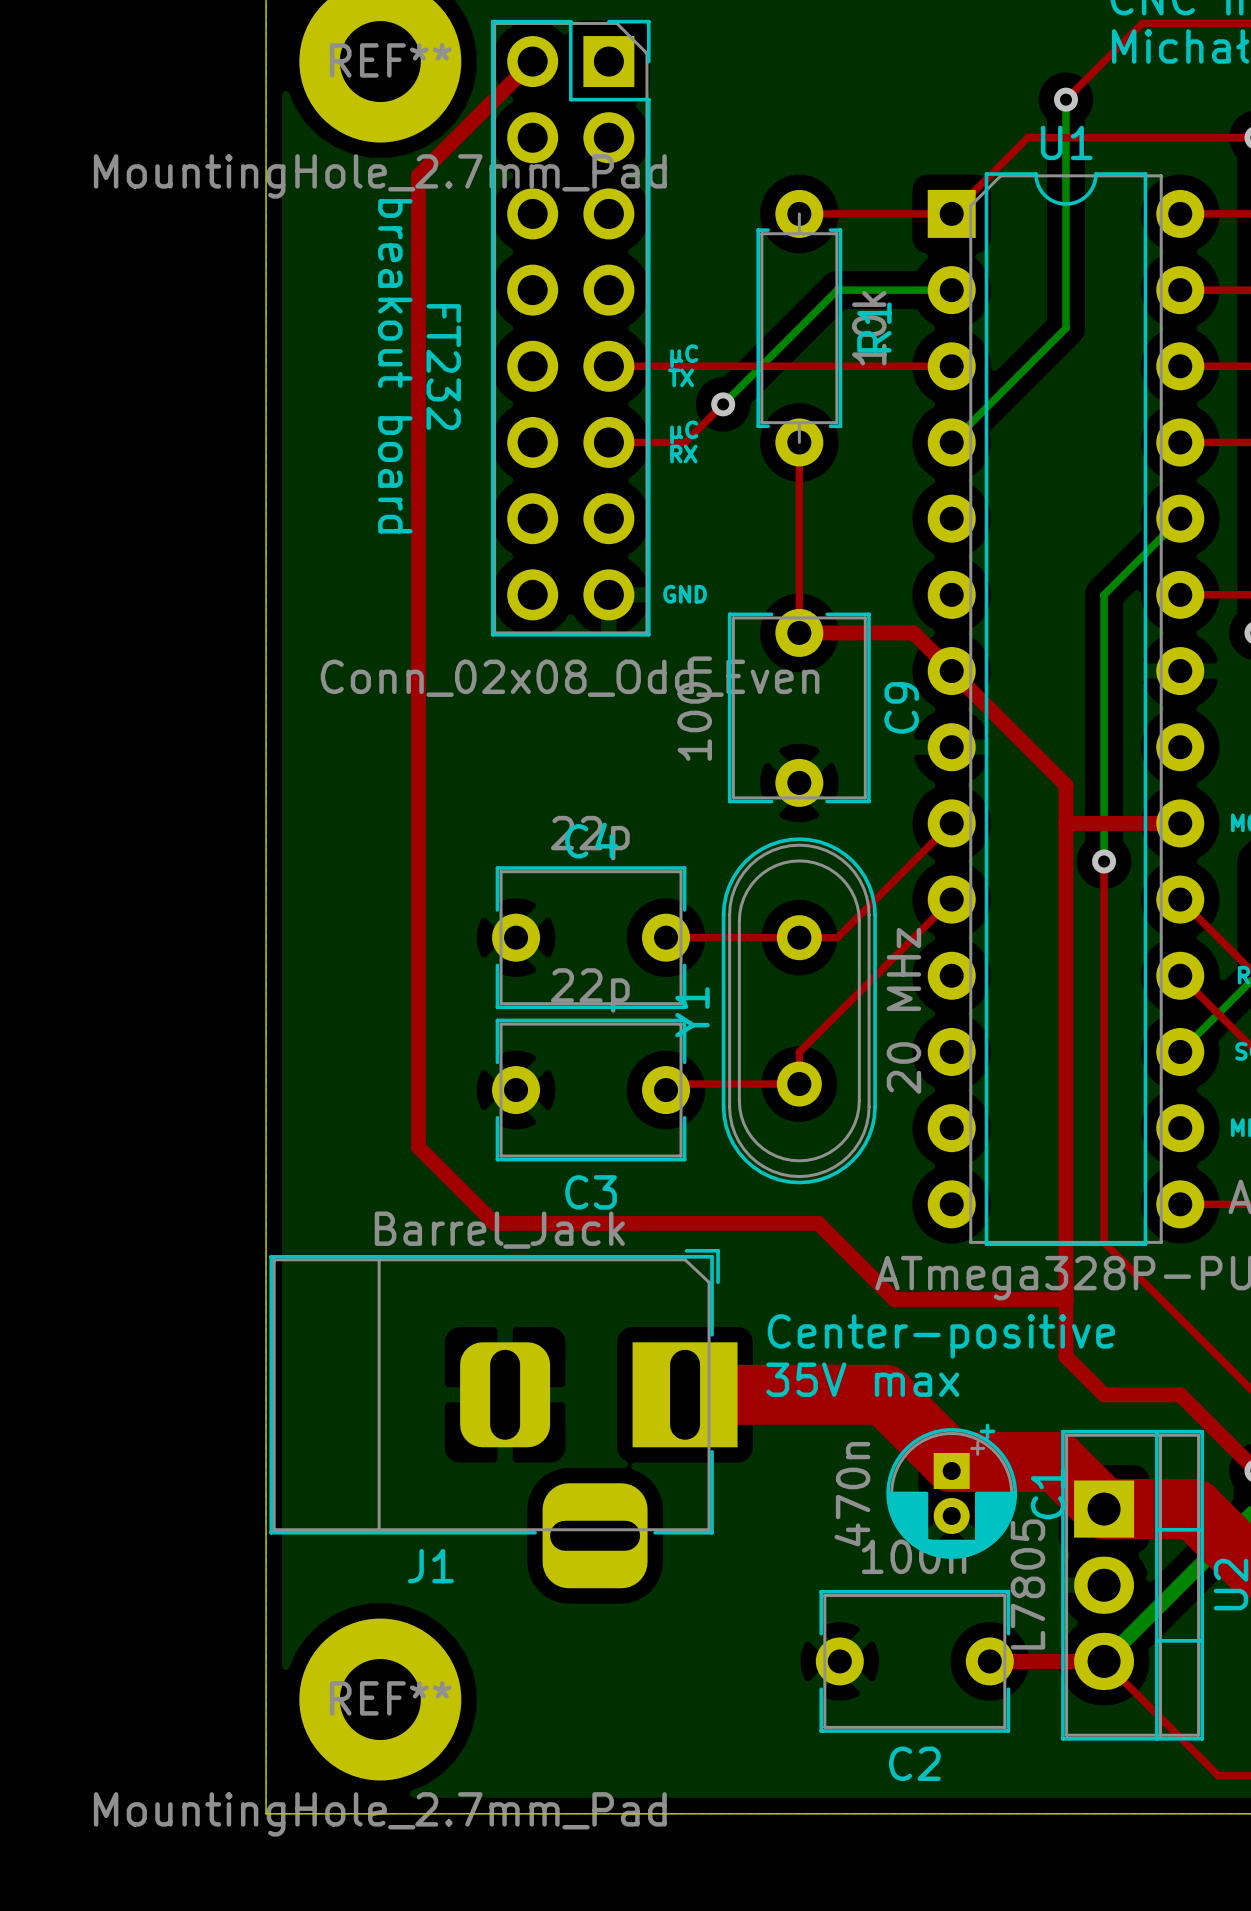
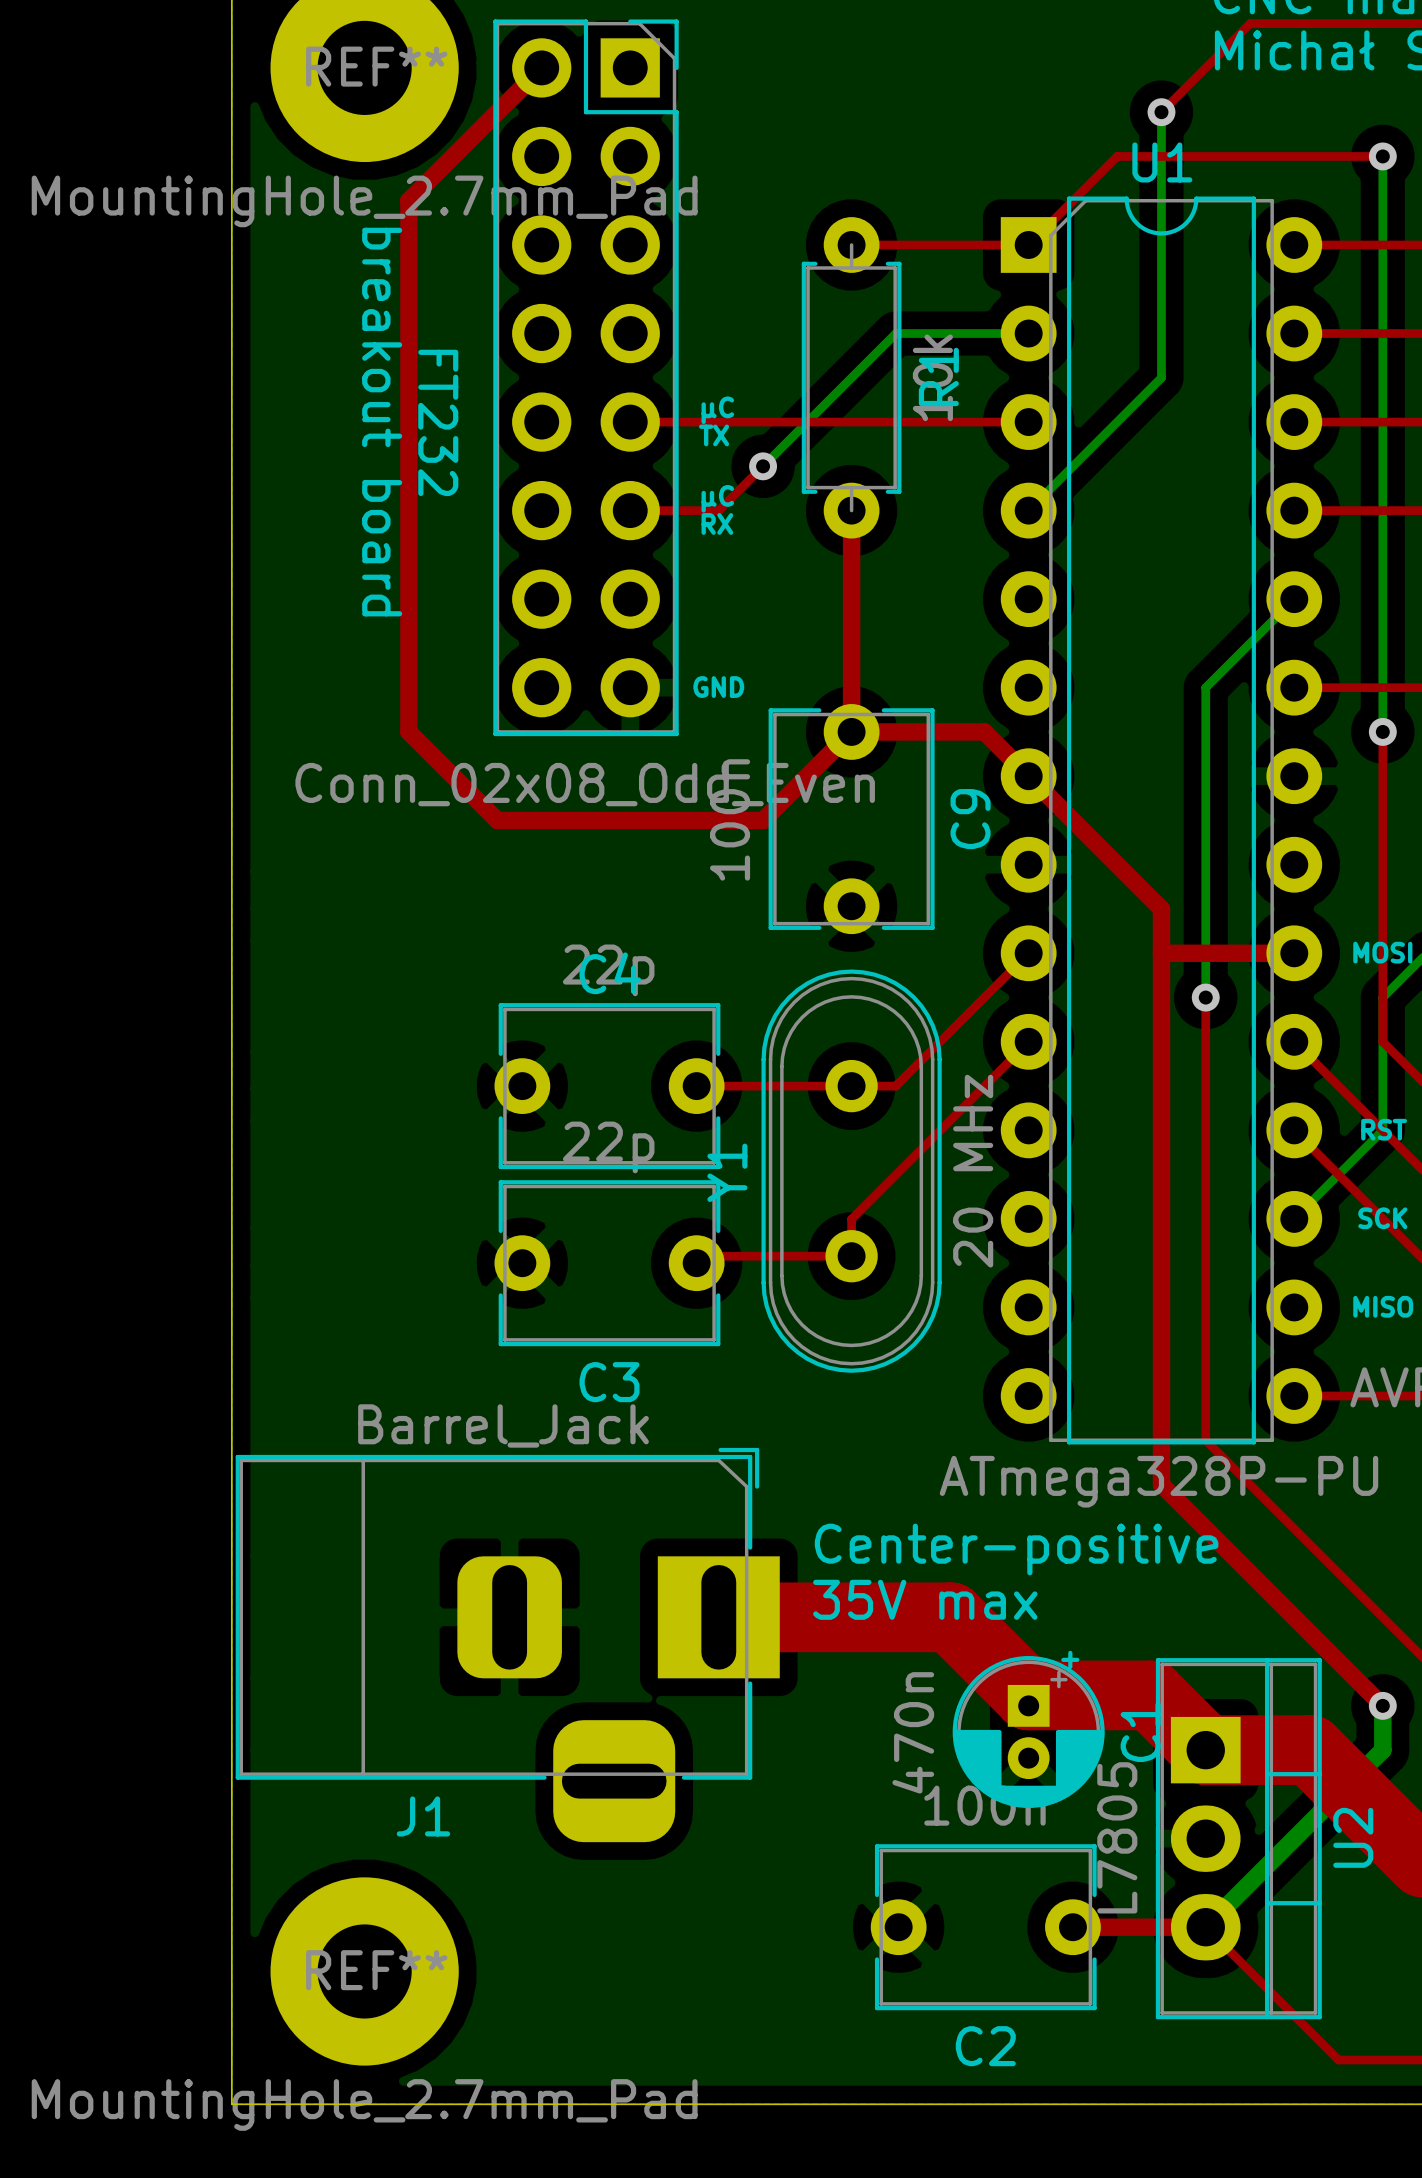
top track width: thin (799, 442) (799, 632) -> thick (851, 510) (851, 731)
top track: (418, 632) (418, 1147) (494, 1223) (818, 1223) (894, 1299) (1065, 1299) -> (408, 731) (497, 820) (763, 820) (851, 731)
top track: (1065, 1280) (1065, 1356) (1104, 1394) (1180, 1394) -> (1161, 1484) (1294, 1617)

